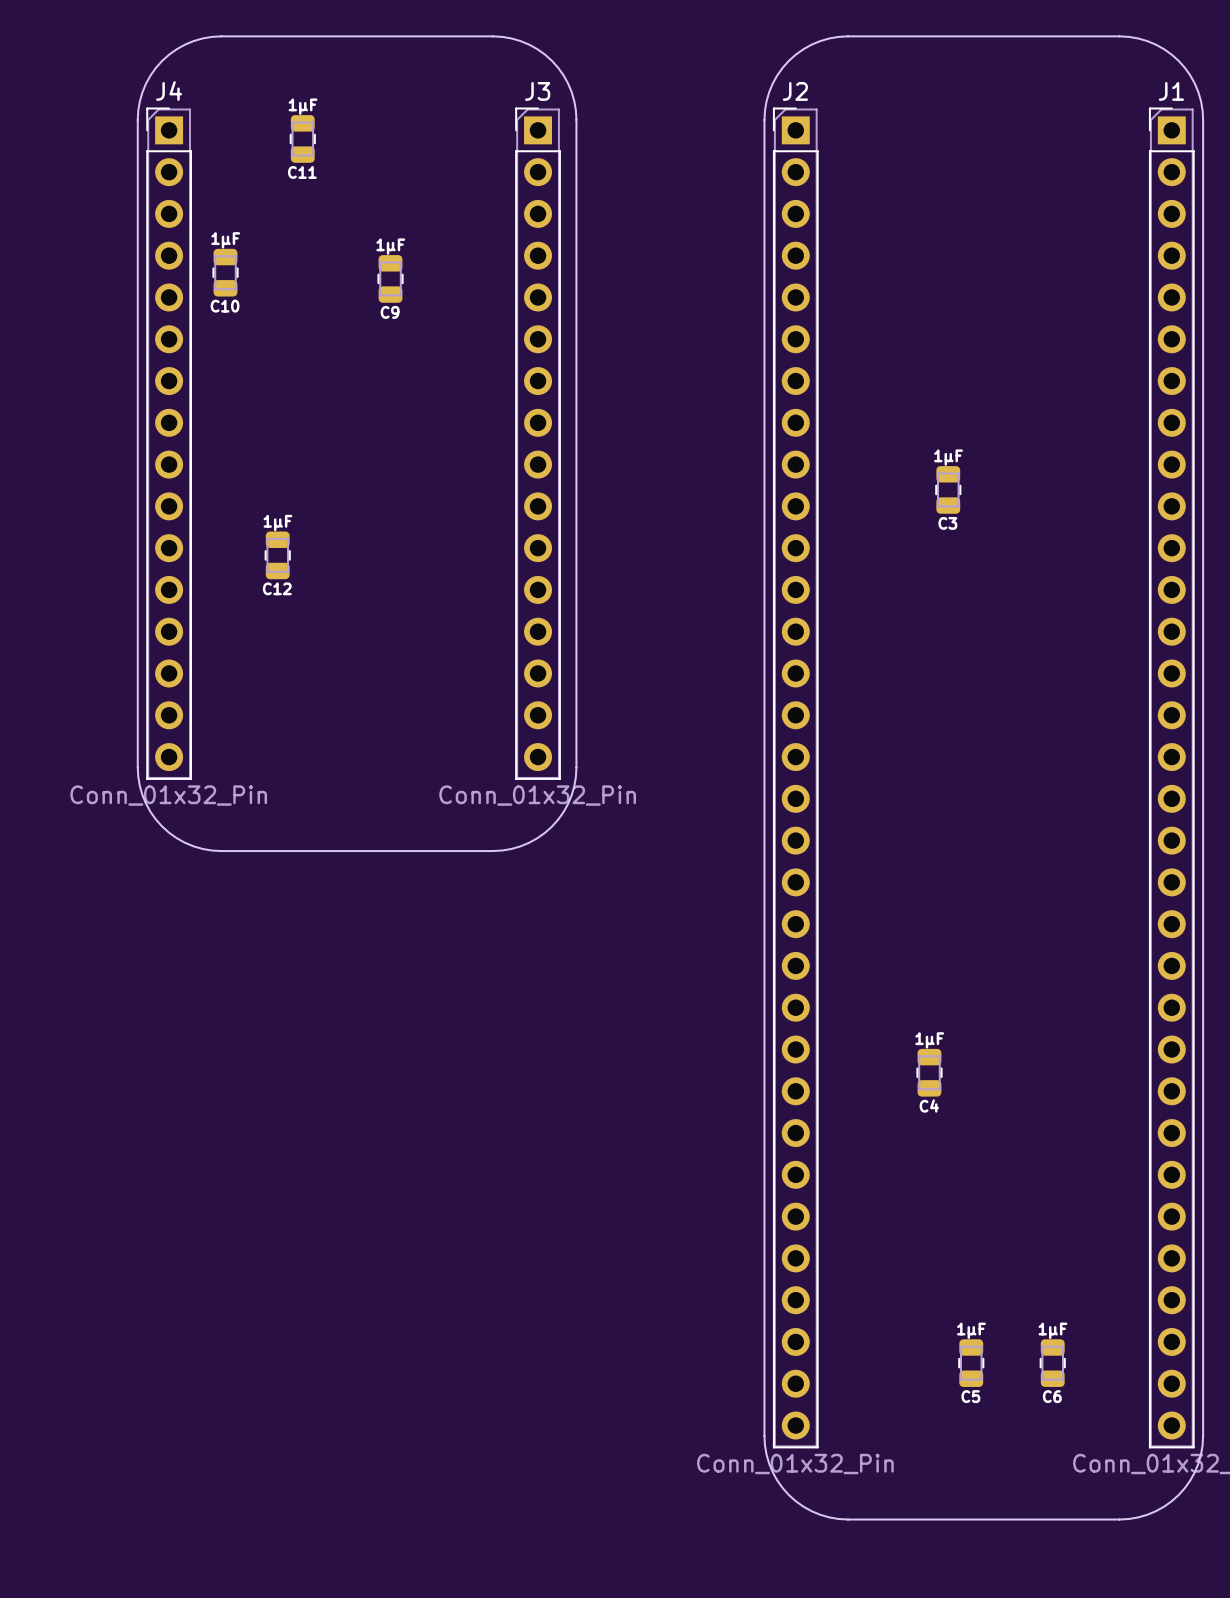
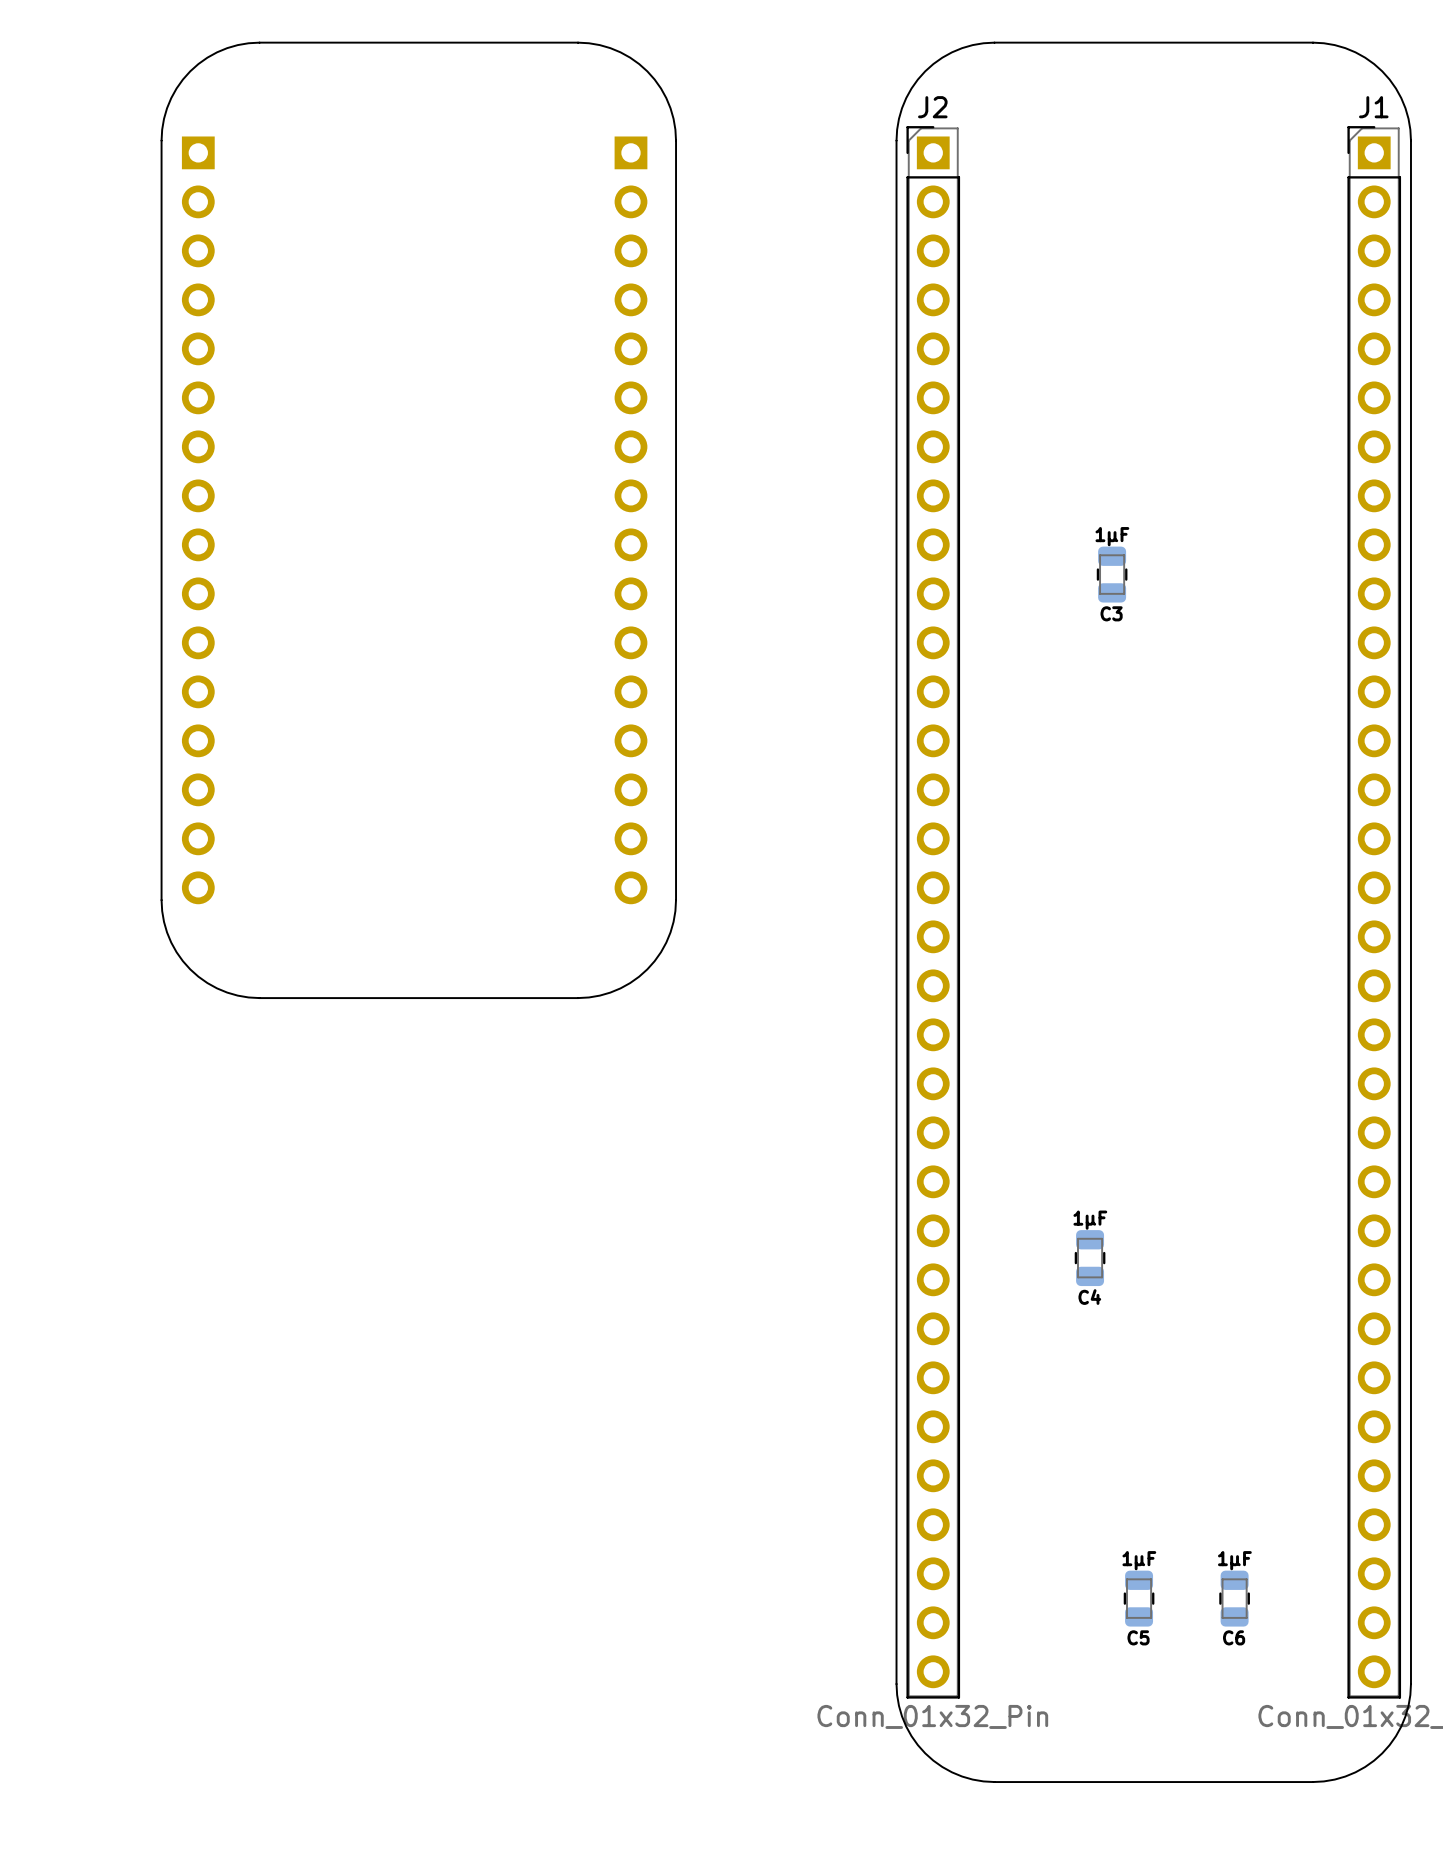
C11: 1μF (302, 138) -> none
C10: 1μF (225, 272) -> none
C9: 1μF (390, 278) -> none
J4 side: bottom (169, 443) -> top (198, 520)
J3 side: bottom (538, 443) -> top (630, 520)
C12: 1μF (277, 555) -> none

